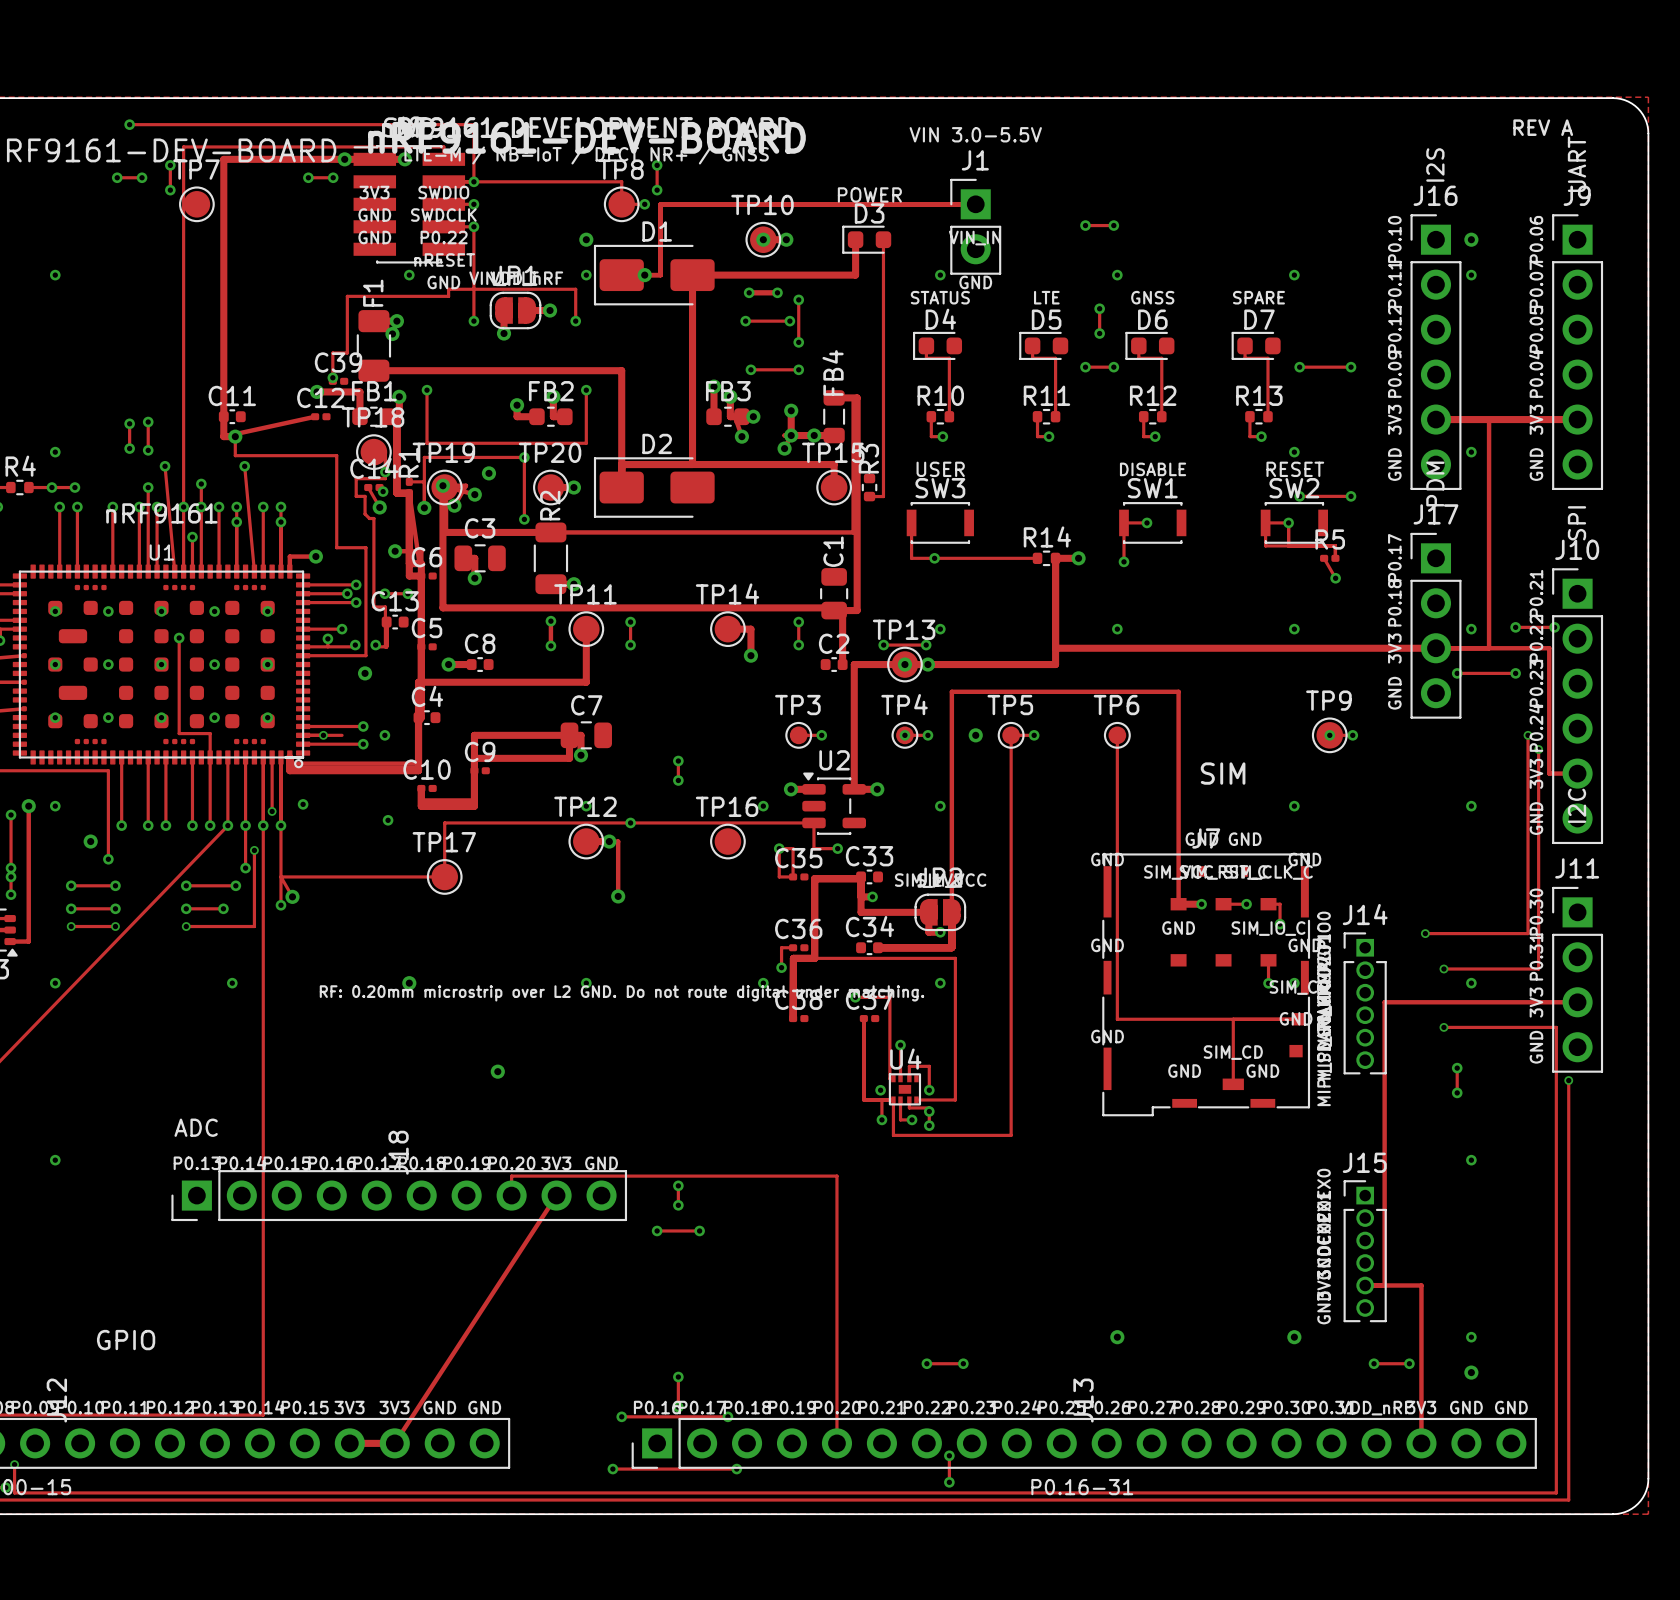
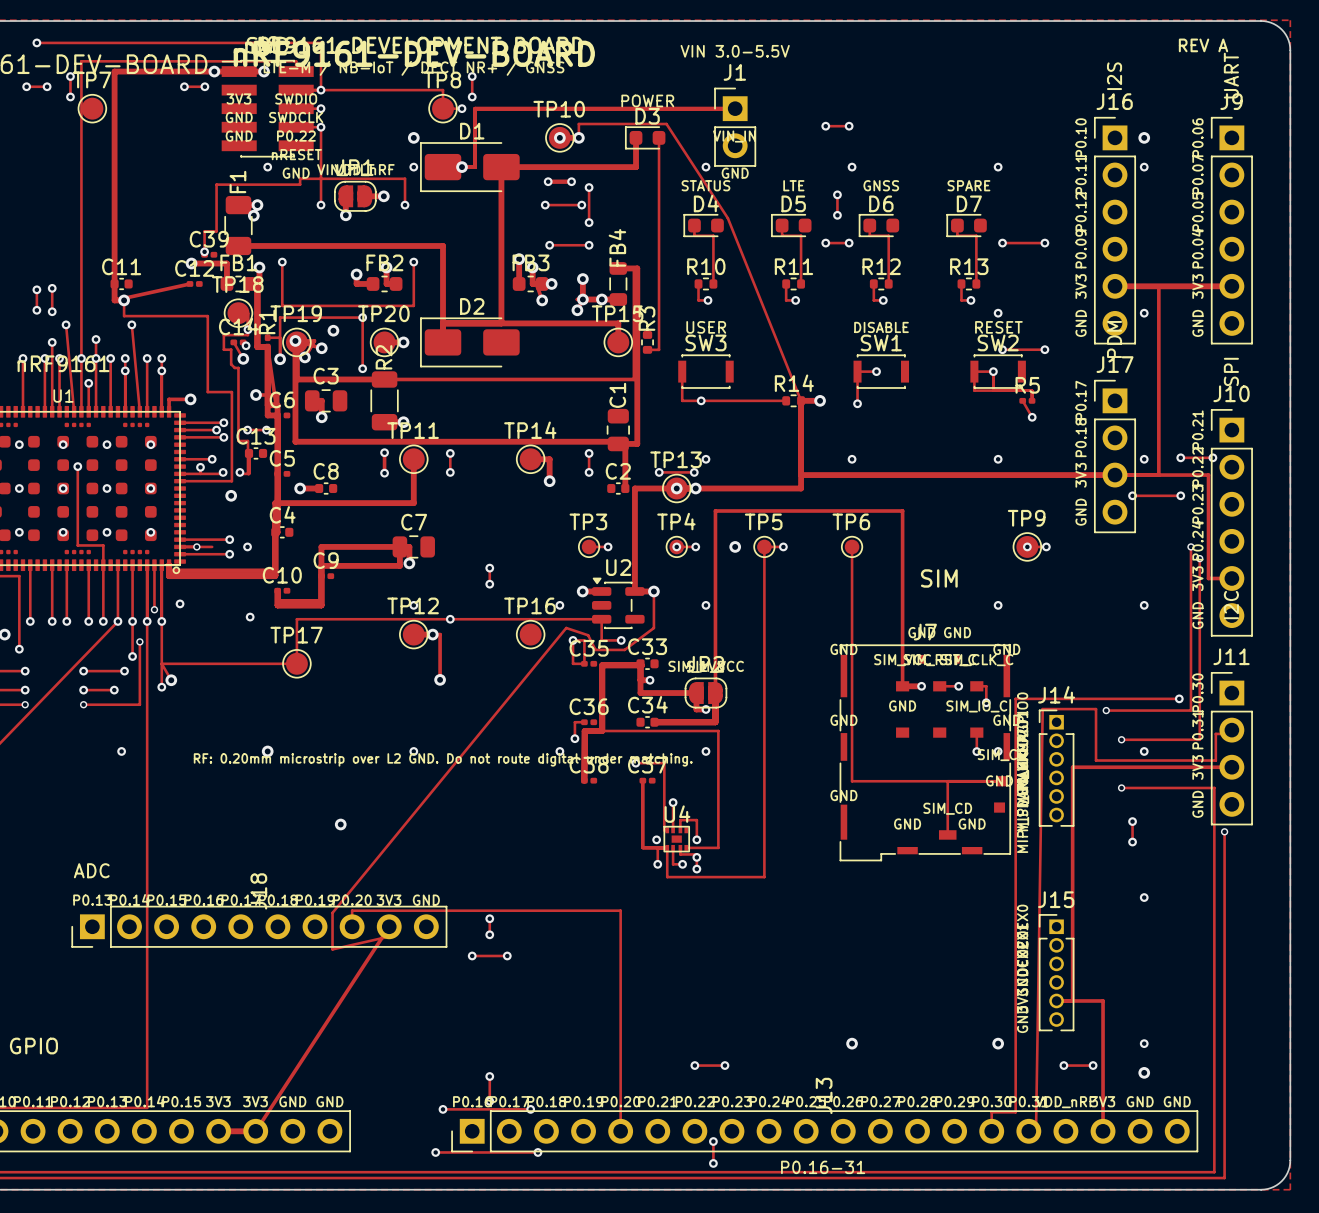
track: none -> (578, 137) (578, 124) (666, 124) (727, 218) (801, 400)
track: none -> (653, 591) (653, 628) (624, 649) (595, 649) (588, 635) (566, 628) (332, 912) (332, 949) (387, 936)
track: none -> (1179, 698) (1015, 698) (1015, 1112) (991, 1112) (991, 1120)
via: none -> (1179, 698)
track: none -> (1225, 733) (1215, 733) (1215, 760) (1096, 760) (1096, 709) (1042, 709) (1036, 1123)

